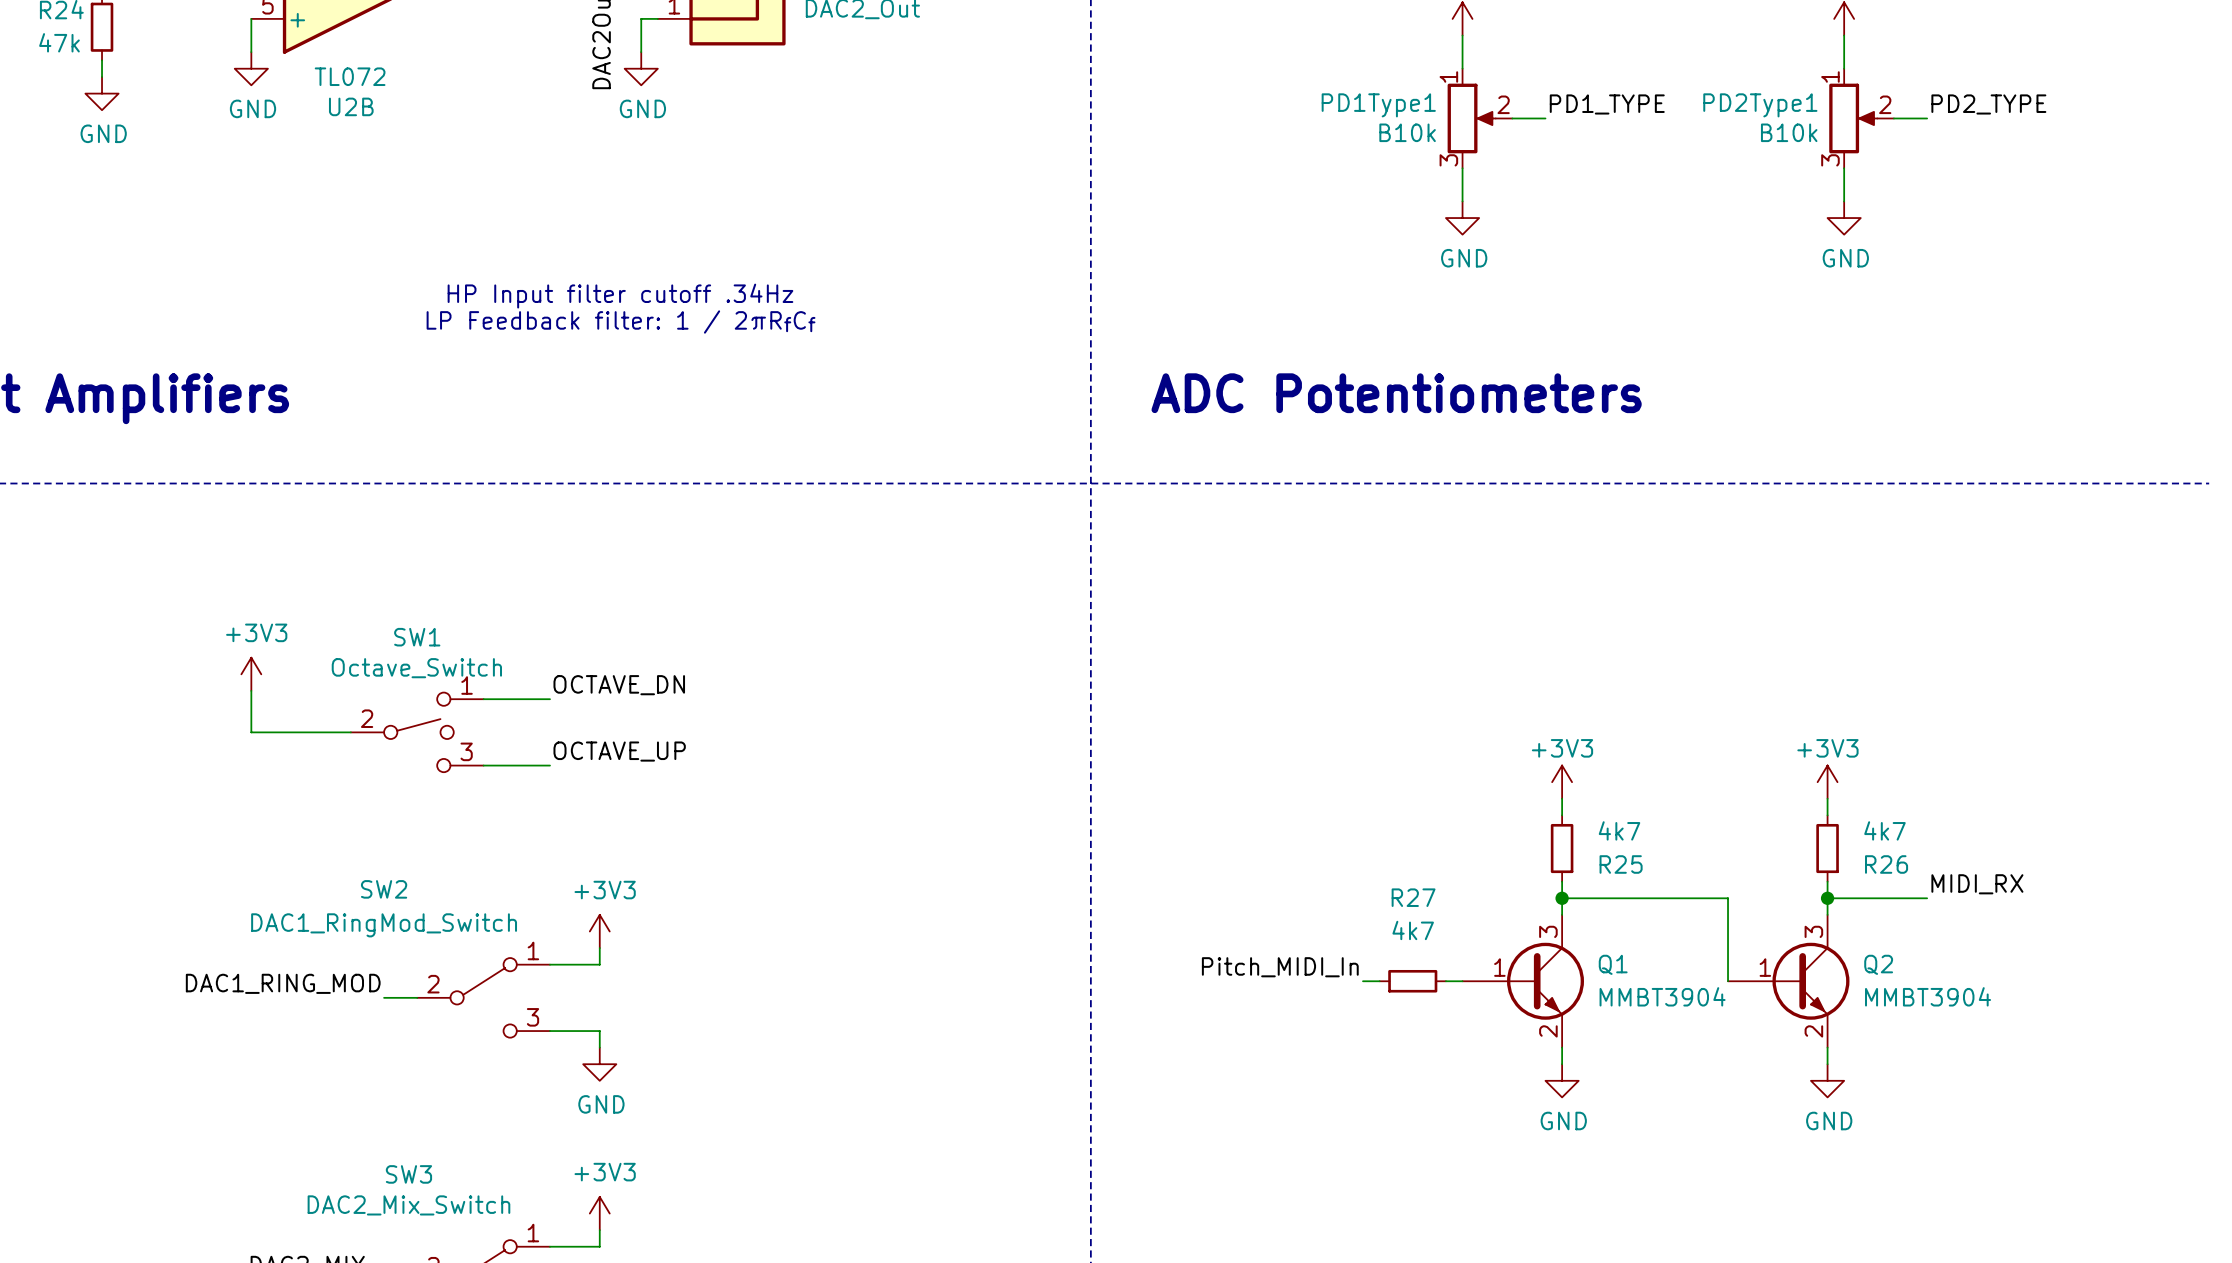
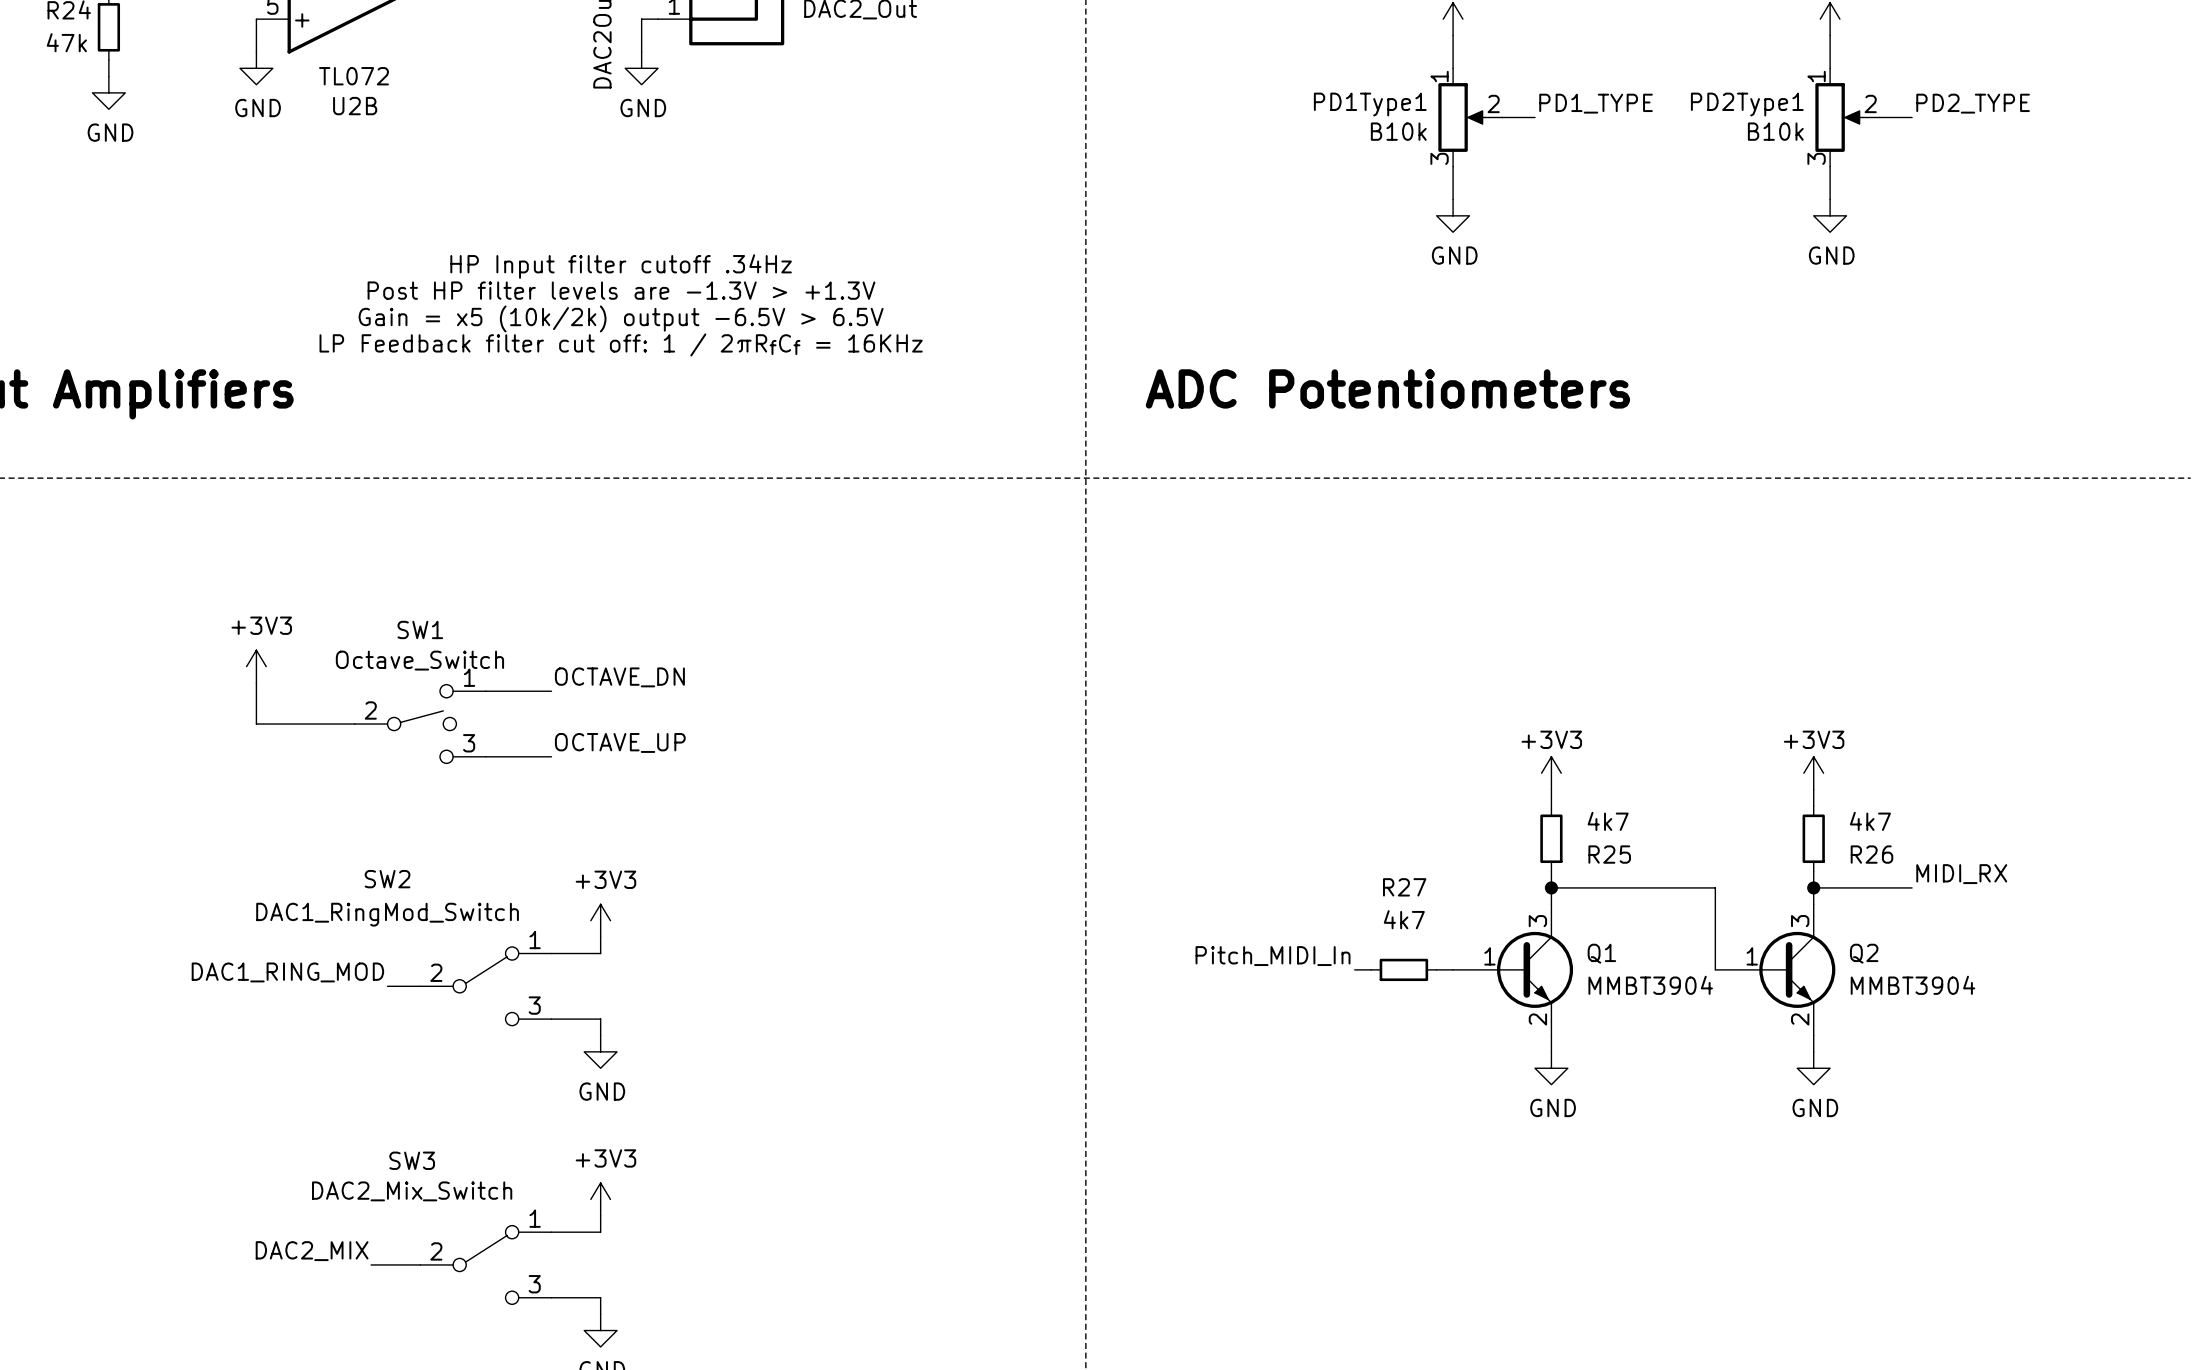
text: none -> HP Input filter cutoff .34Hz (621, 266)
text: HP Input filter cutoff .34Hz (620, 296) -> Post HP filter levels are -1.3V > +1.3V (621, 290)
text: LP Feedback filter: 1 / 2πRfCf (621, 322) -> Gain = x5 (10k/2k) output -6.5V > 6.5V (621, 318)
text: none -> LP Feedback filter cut off: 1 / 2πRfCf = 16KHz (621, 344)

